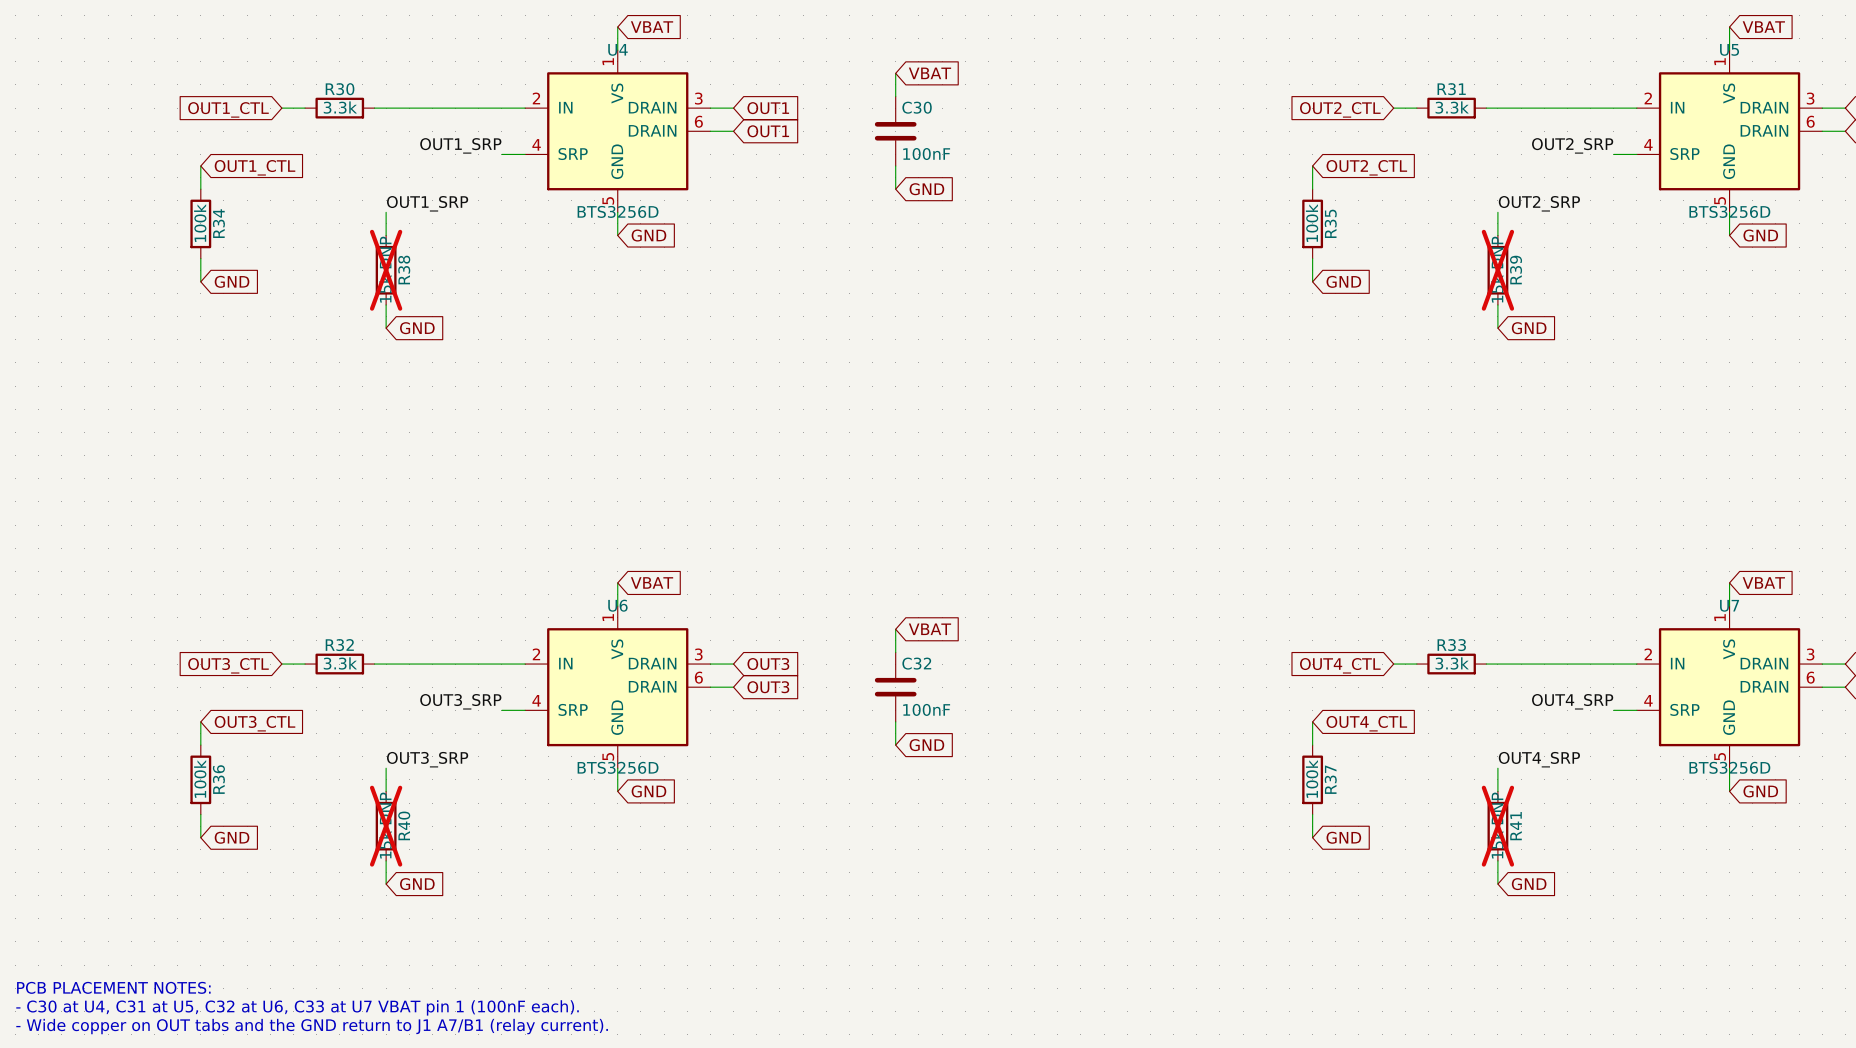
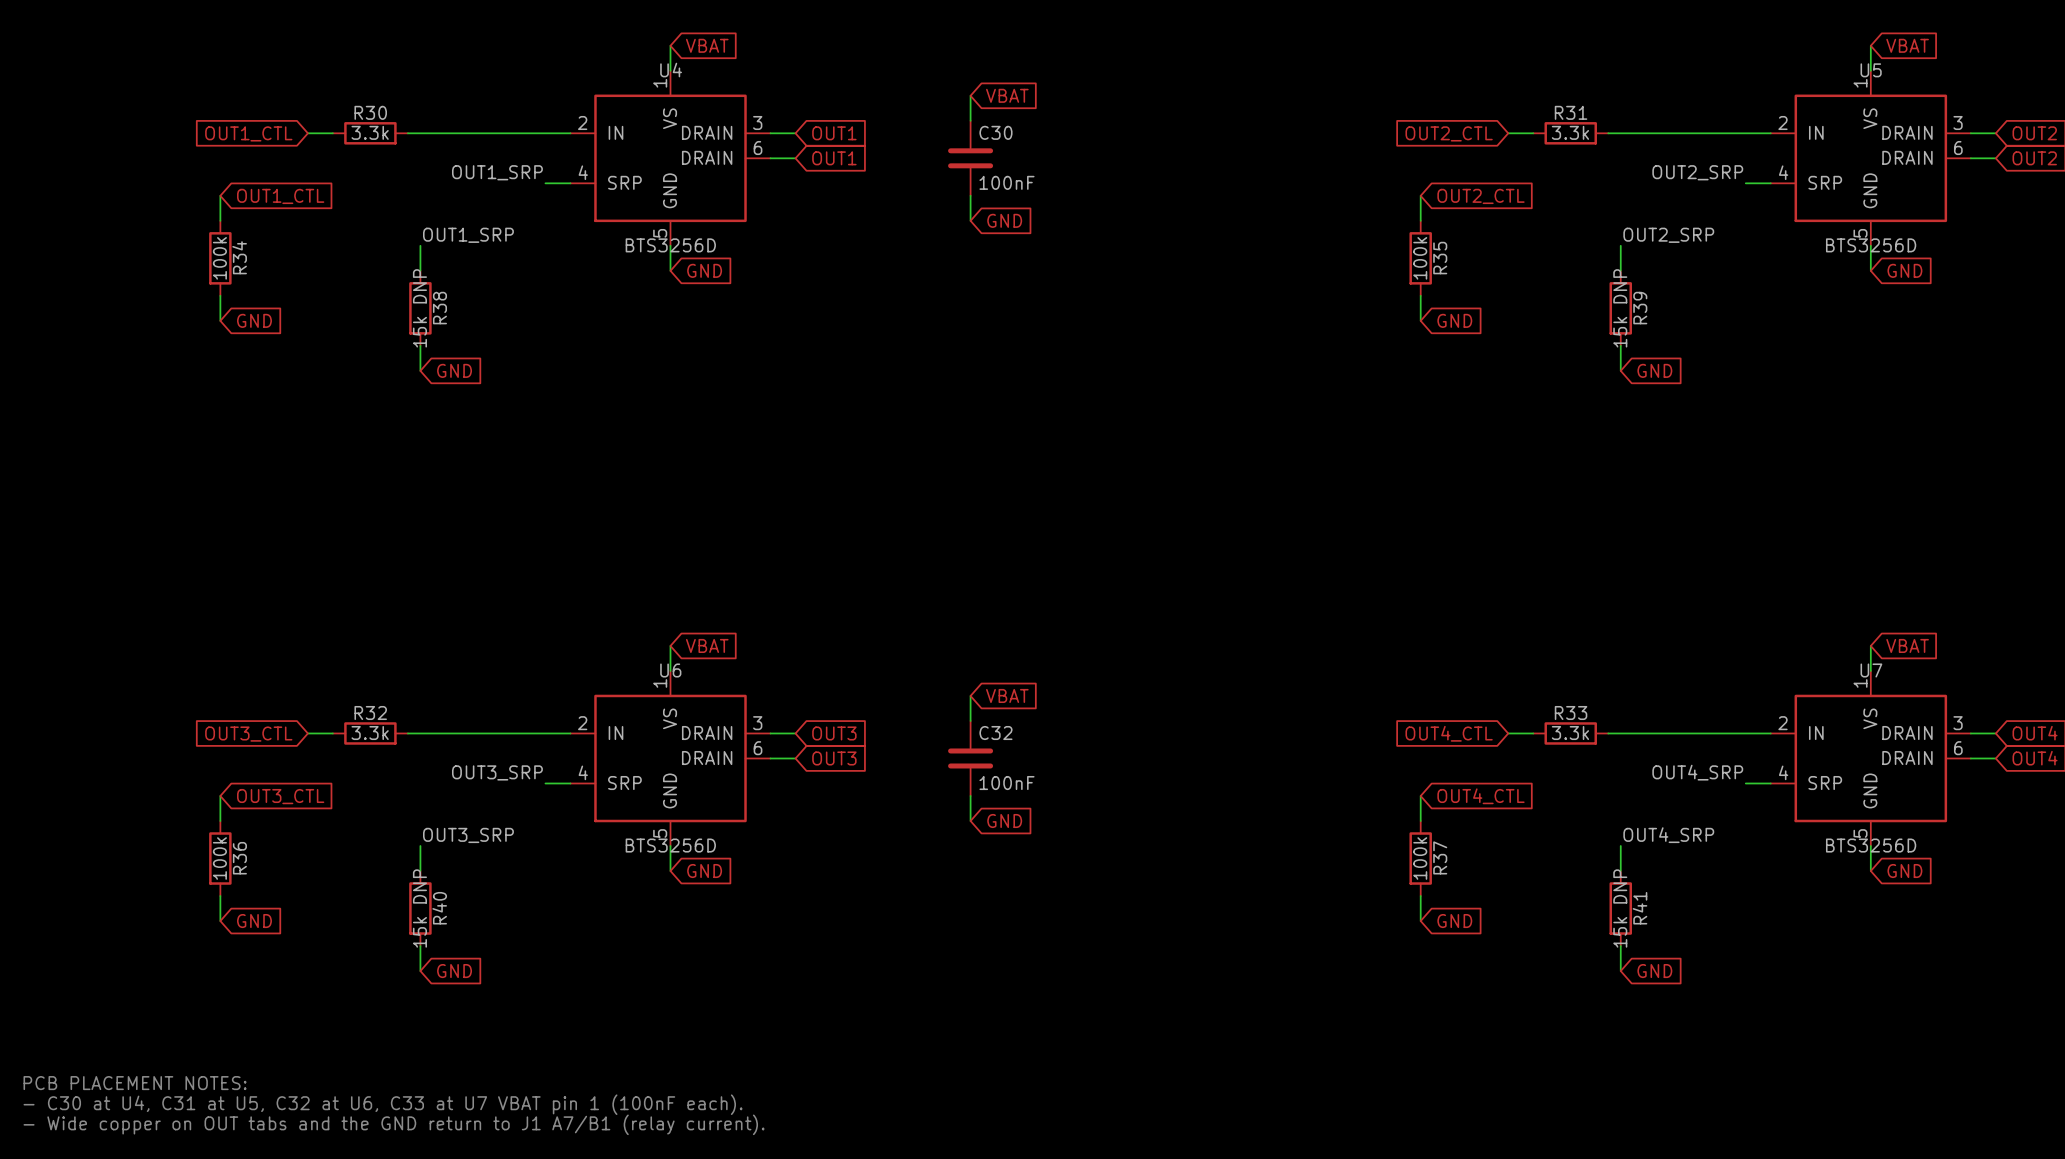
R38 do-not-place cross: (386, 270) -> none
R39 do-not-place cross: (1497, 270) -> none
R40 do-not-place cross: (386, 826) -> none
R41 do-not-place cross: (1497, 826) -> none

